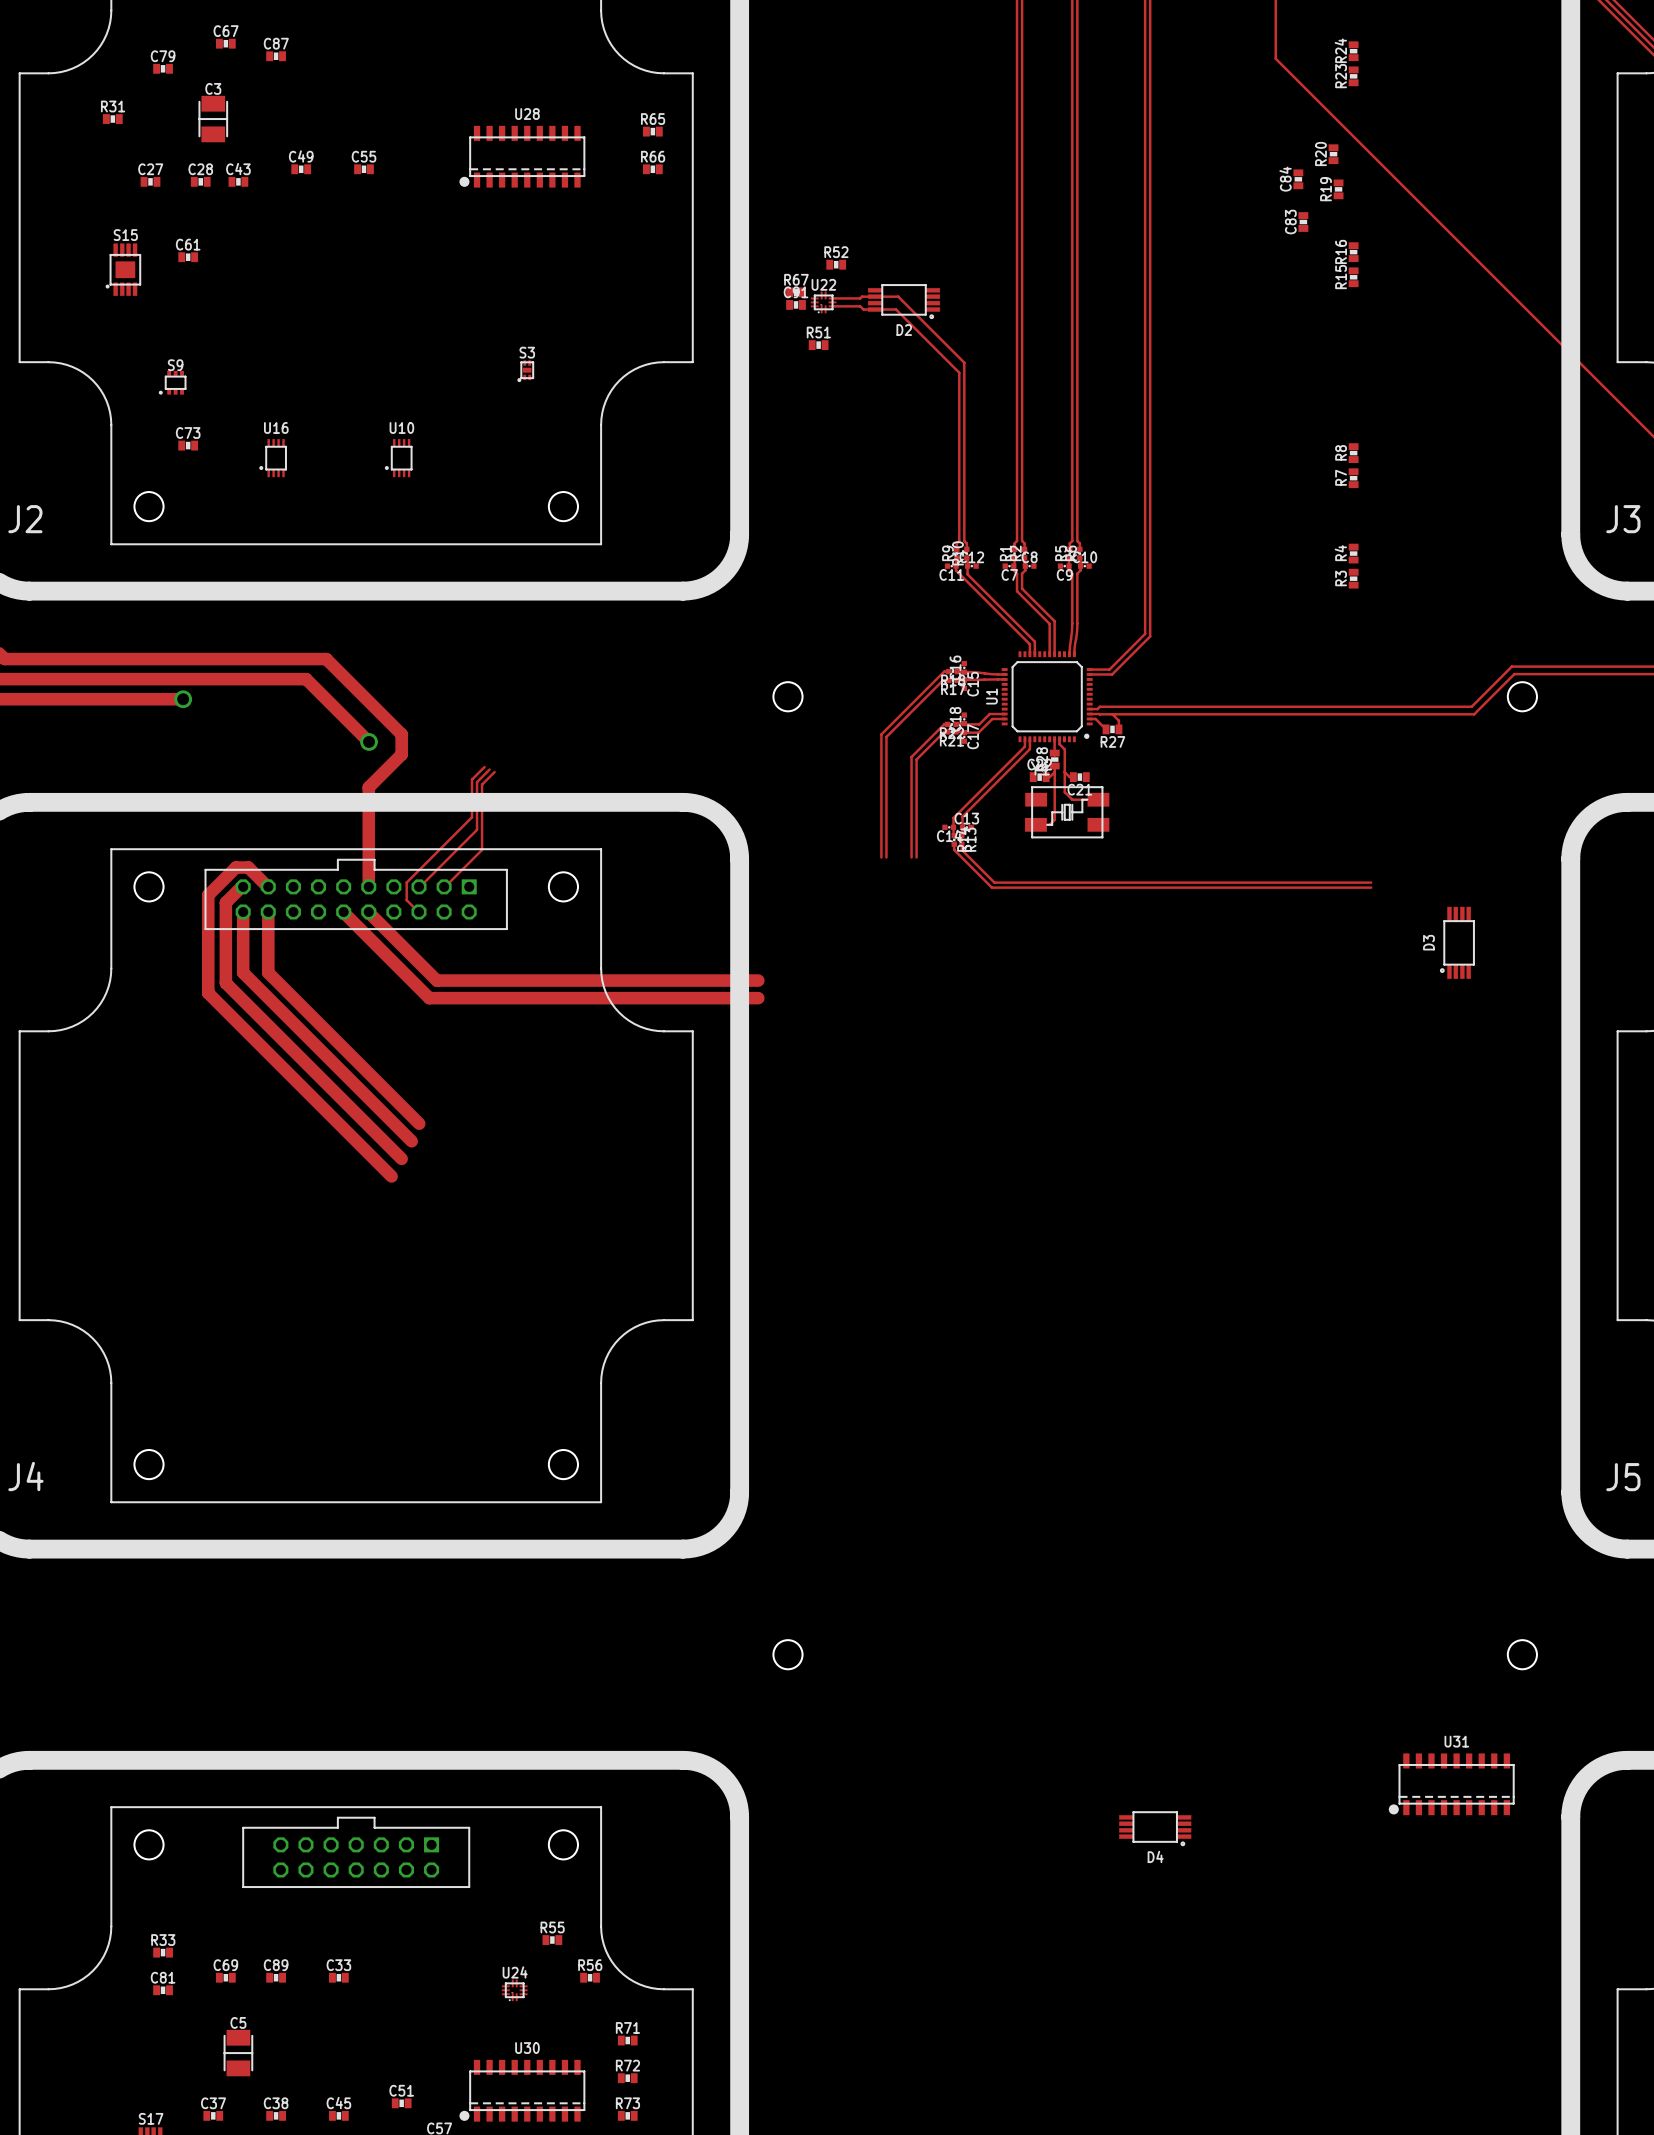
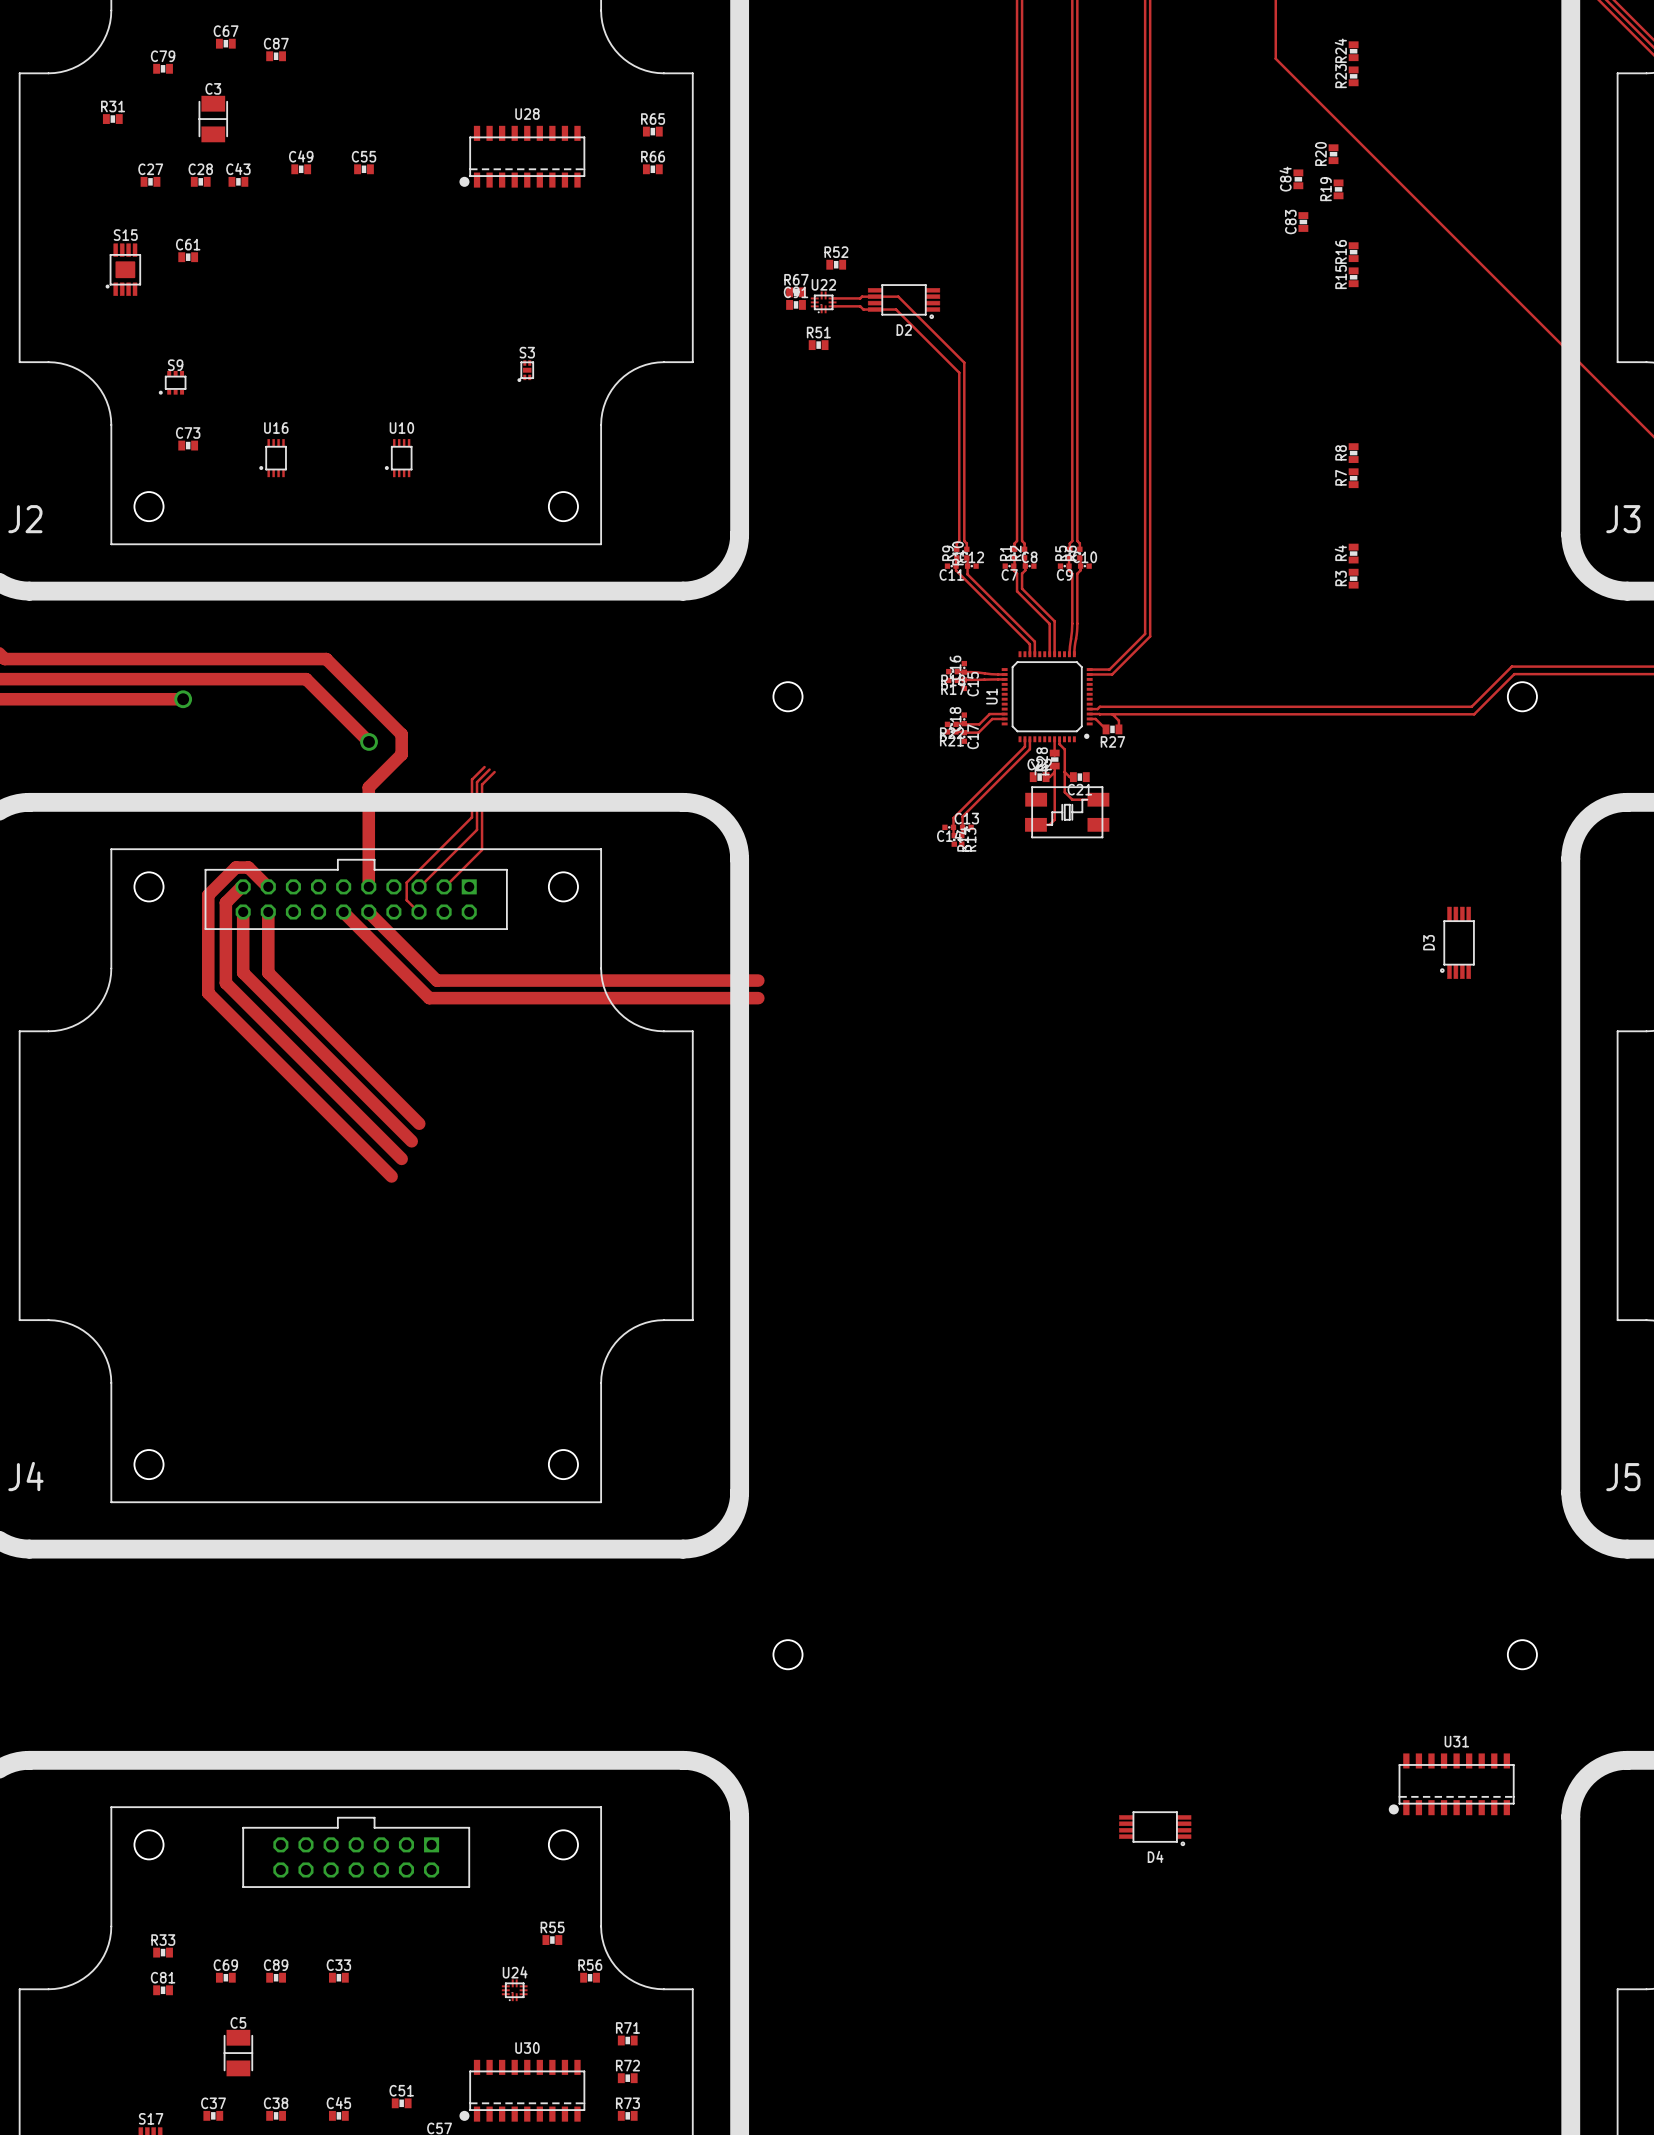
track: (948, 671) (944, 671) (881, 734) (881, 857) -> none
track: (948, 680) (942, 680) (886, 736) (886, 857) -> none
track: (947, 724) (944, 724) (911, 757) (911, 857) -> none
track: (947, 731) (944, 731) (916, 759) (916, 857) -> none
track: (954, 844) (954, 849) (991, 887) (1371, 887) -> none
track: (961, 844) (961, 849) (994, 882) (1371, 882) -> none

